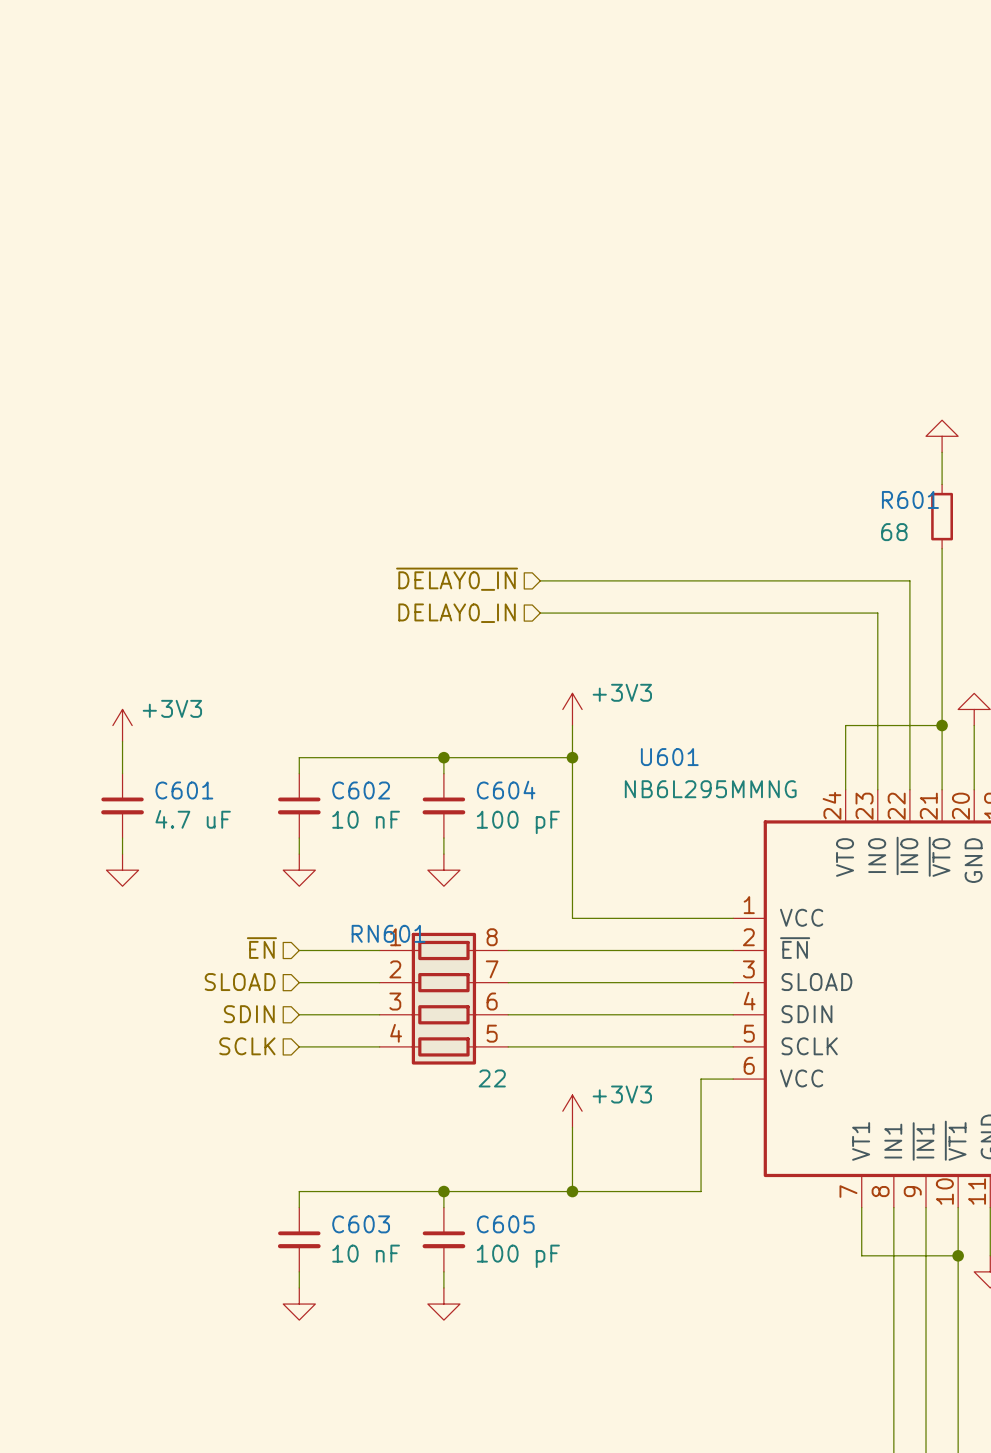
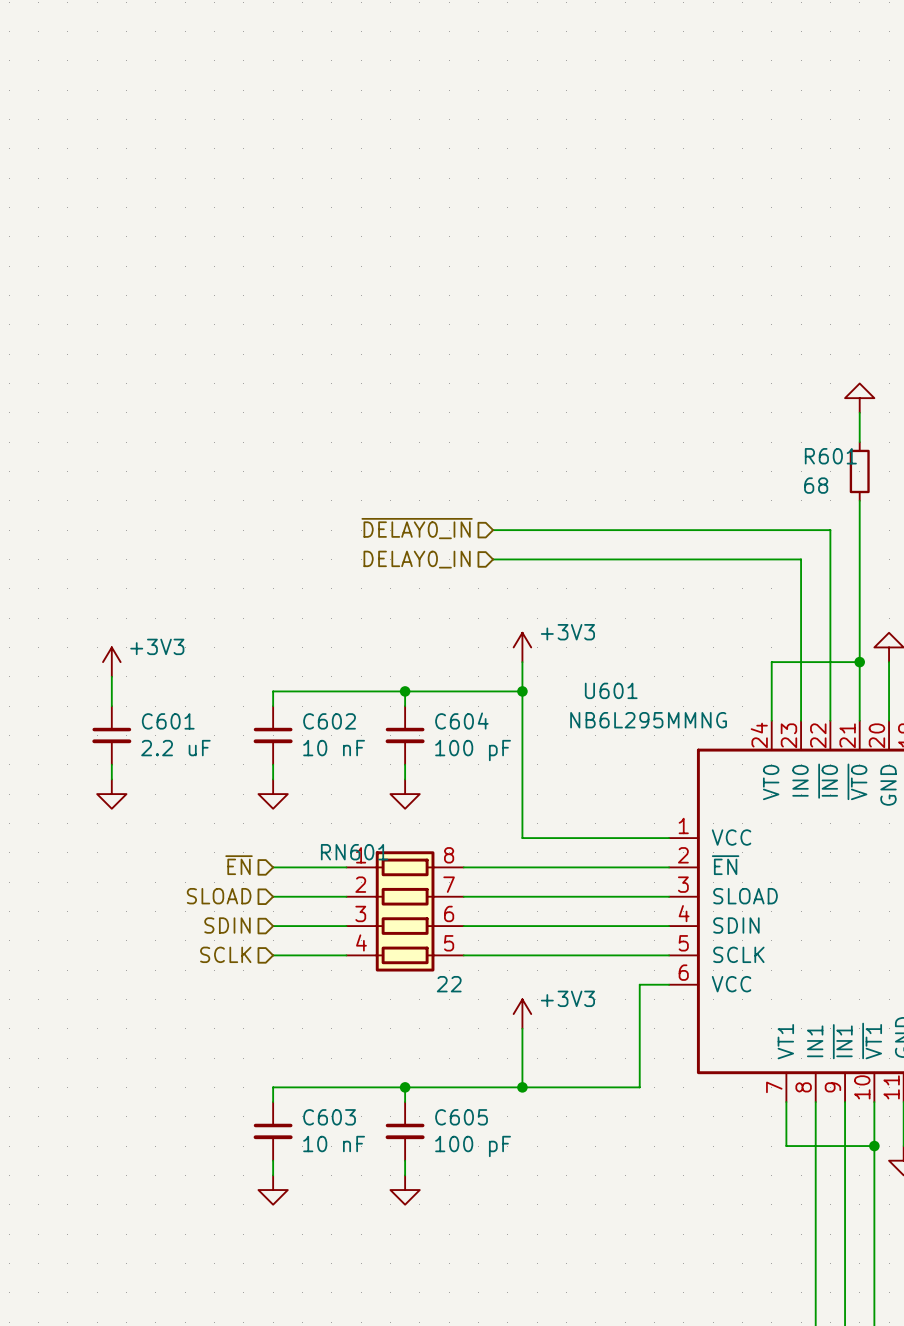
C601 value: 4.7 uF (193, 819) -> 2.2 uF (175, 748)

